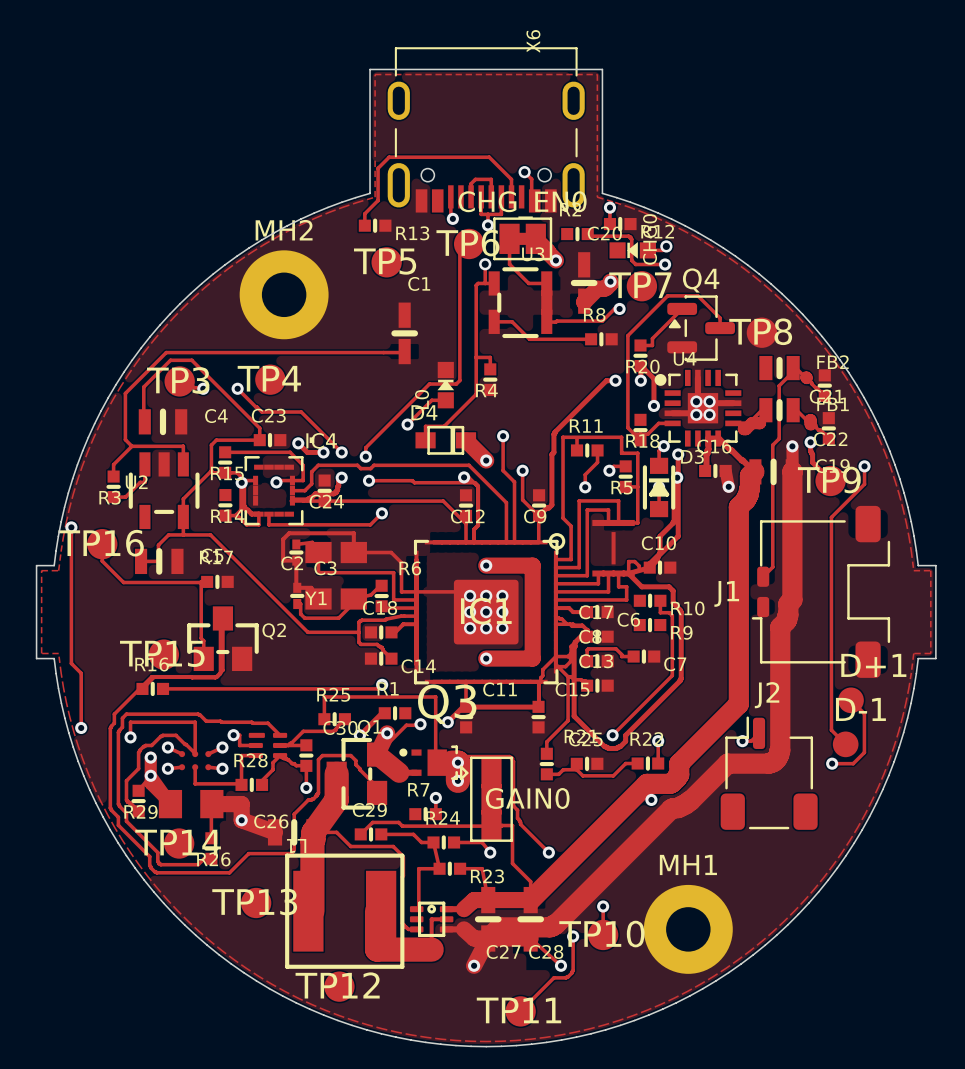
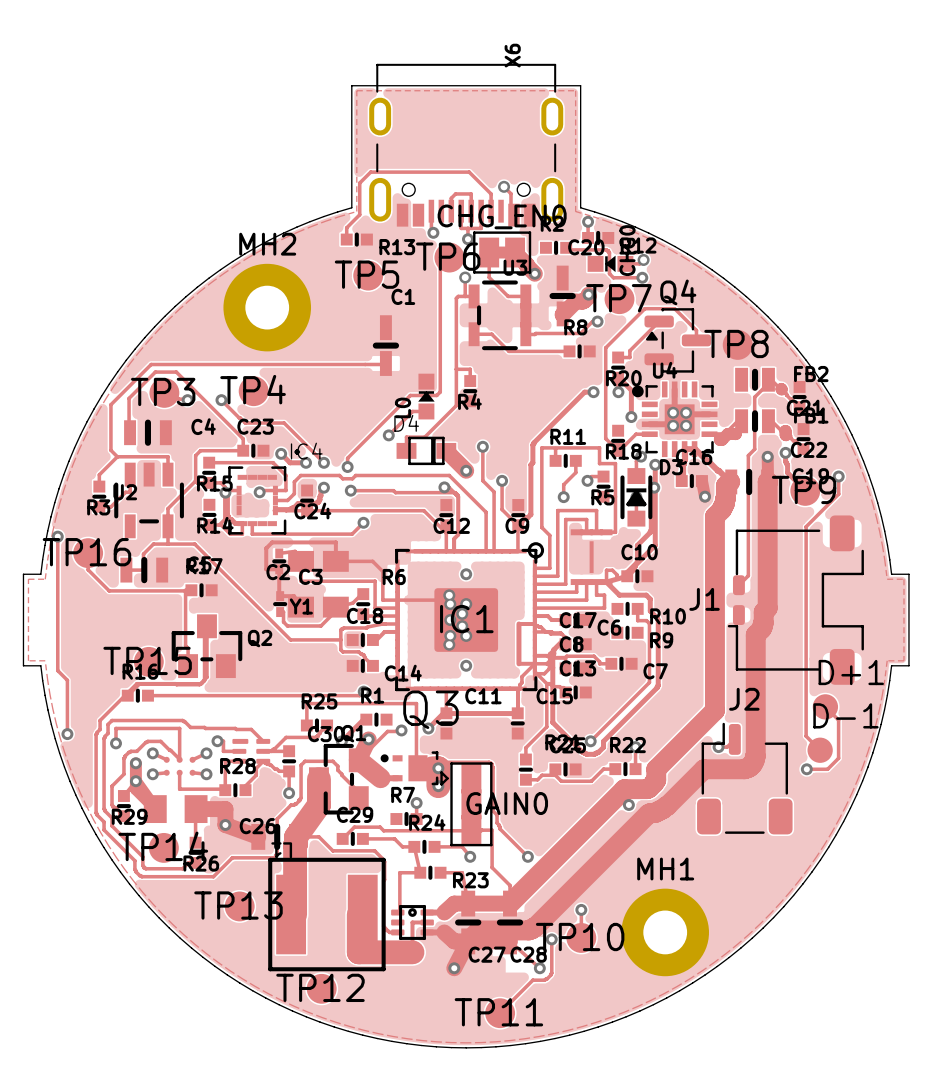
track: (486, 565) (532, 565) (532, 658) (486, 658) -> none
via: none -> (449, 595)
via: (502, 595) -> none
via: none -> (462, 613)
via: (486, 612) -> none
via: (502, 612) -> none
track: none -> (534, 624) (518, 624) (518, 663) (534, 663)
via: none -> (462, 626)
via: (502, 628) -> none
via: none -> (449, 644)
track: none -> (534, 655) (565, 657)

